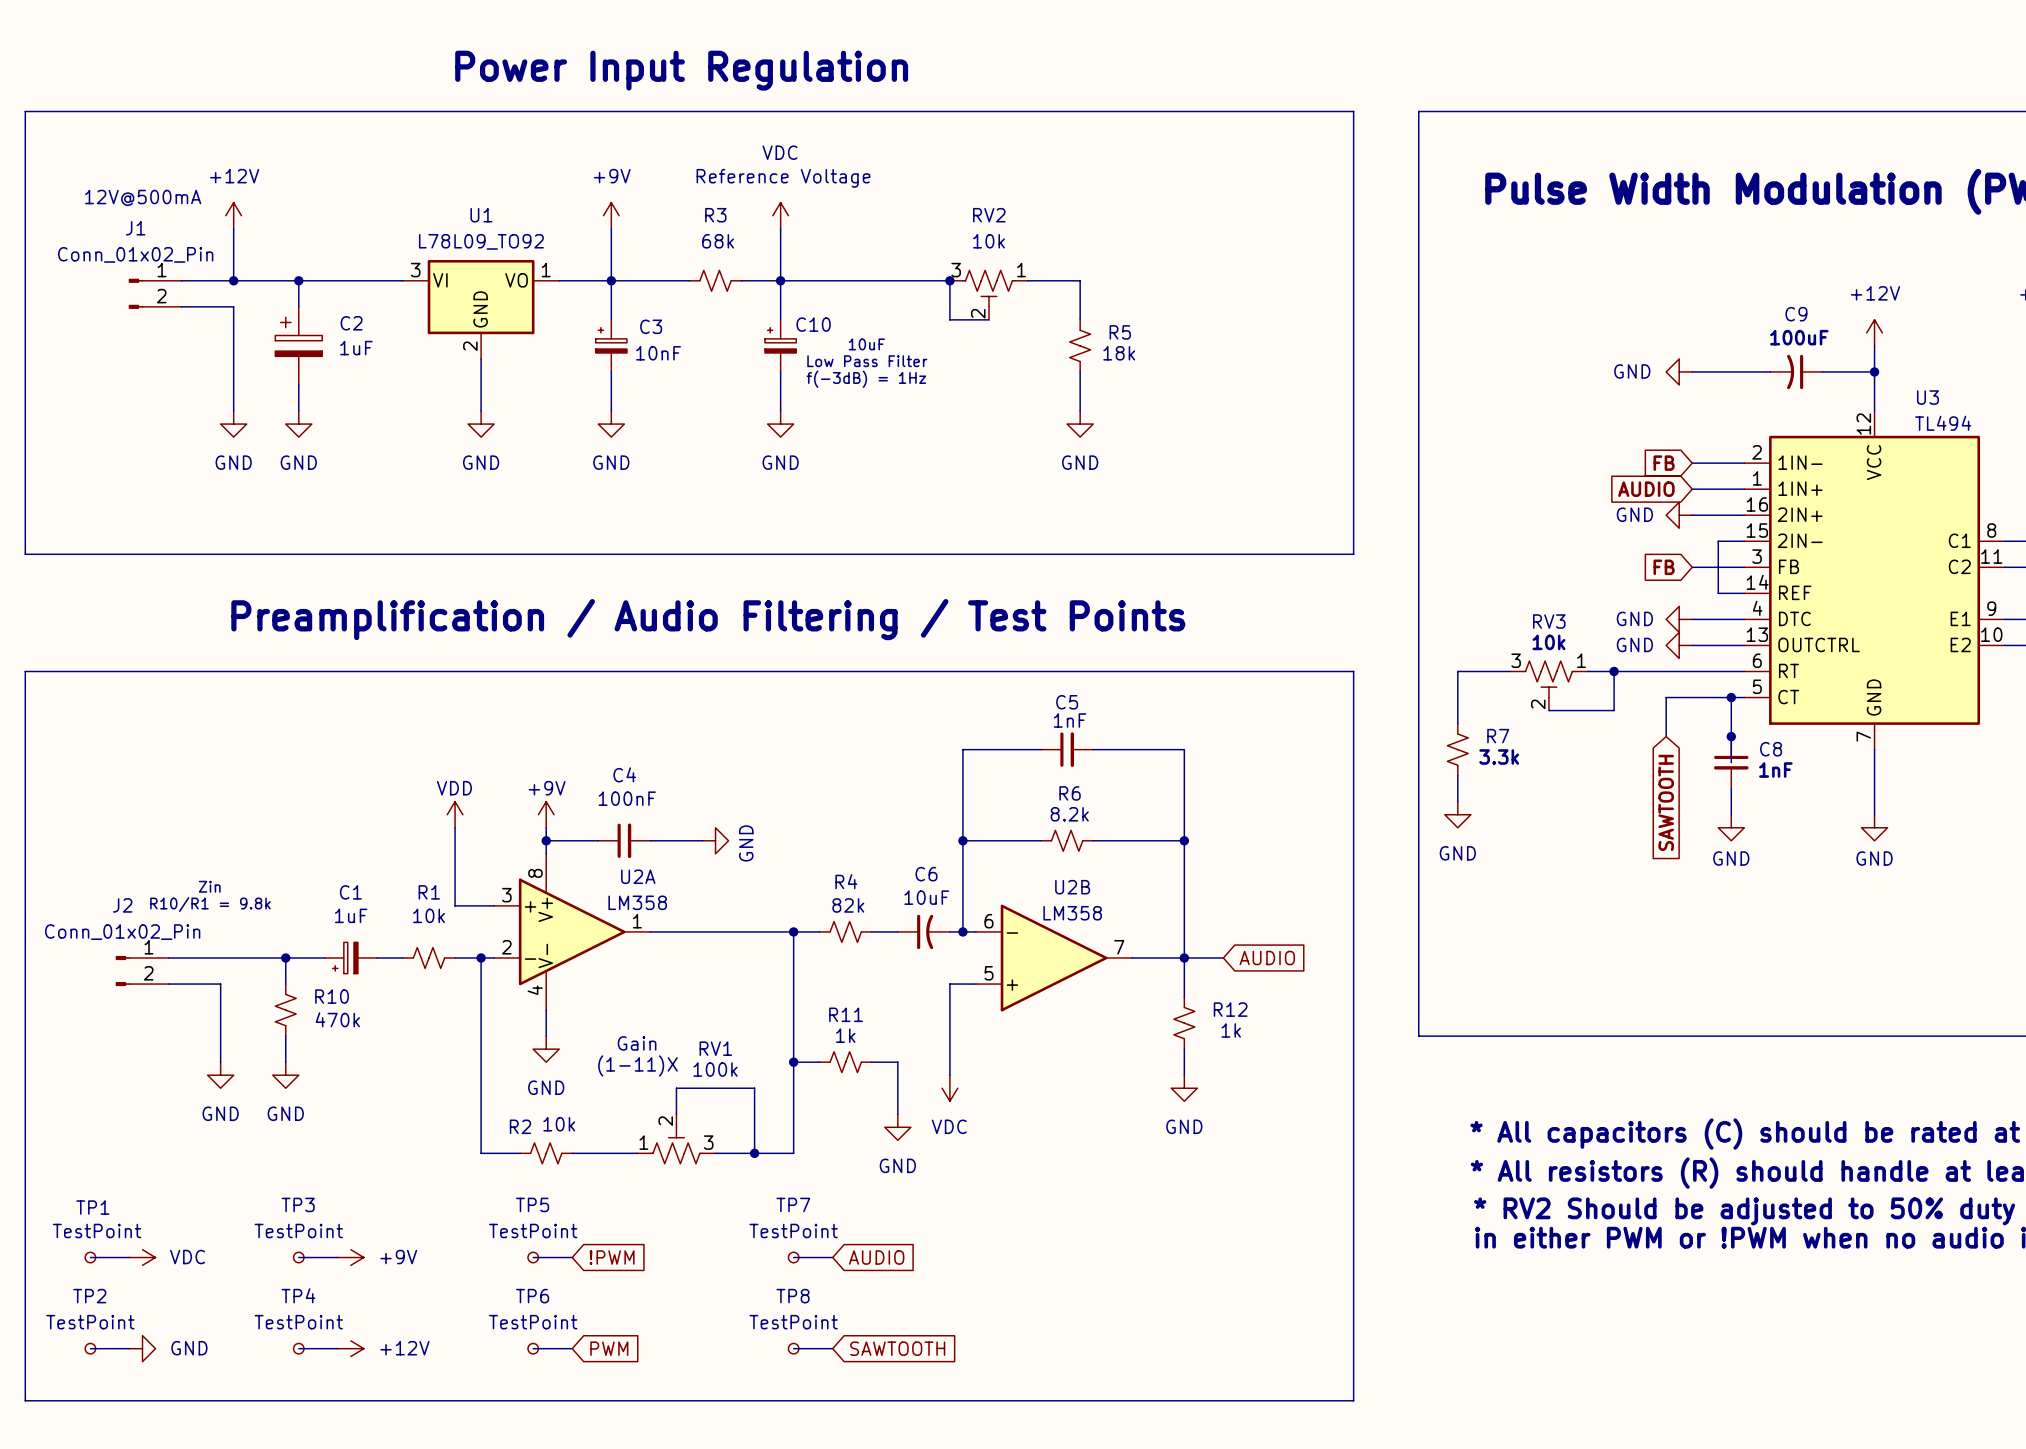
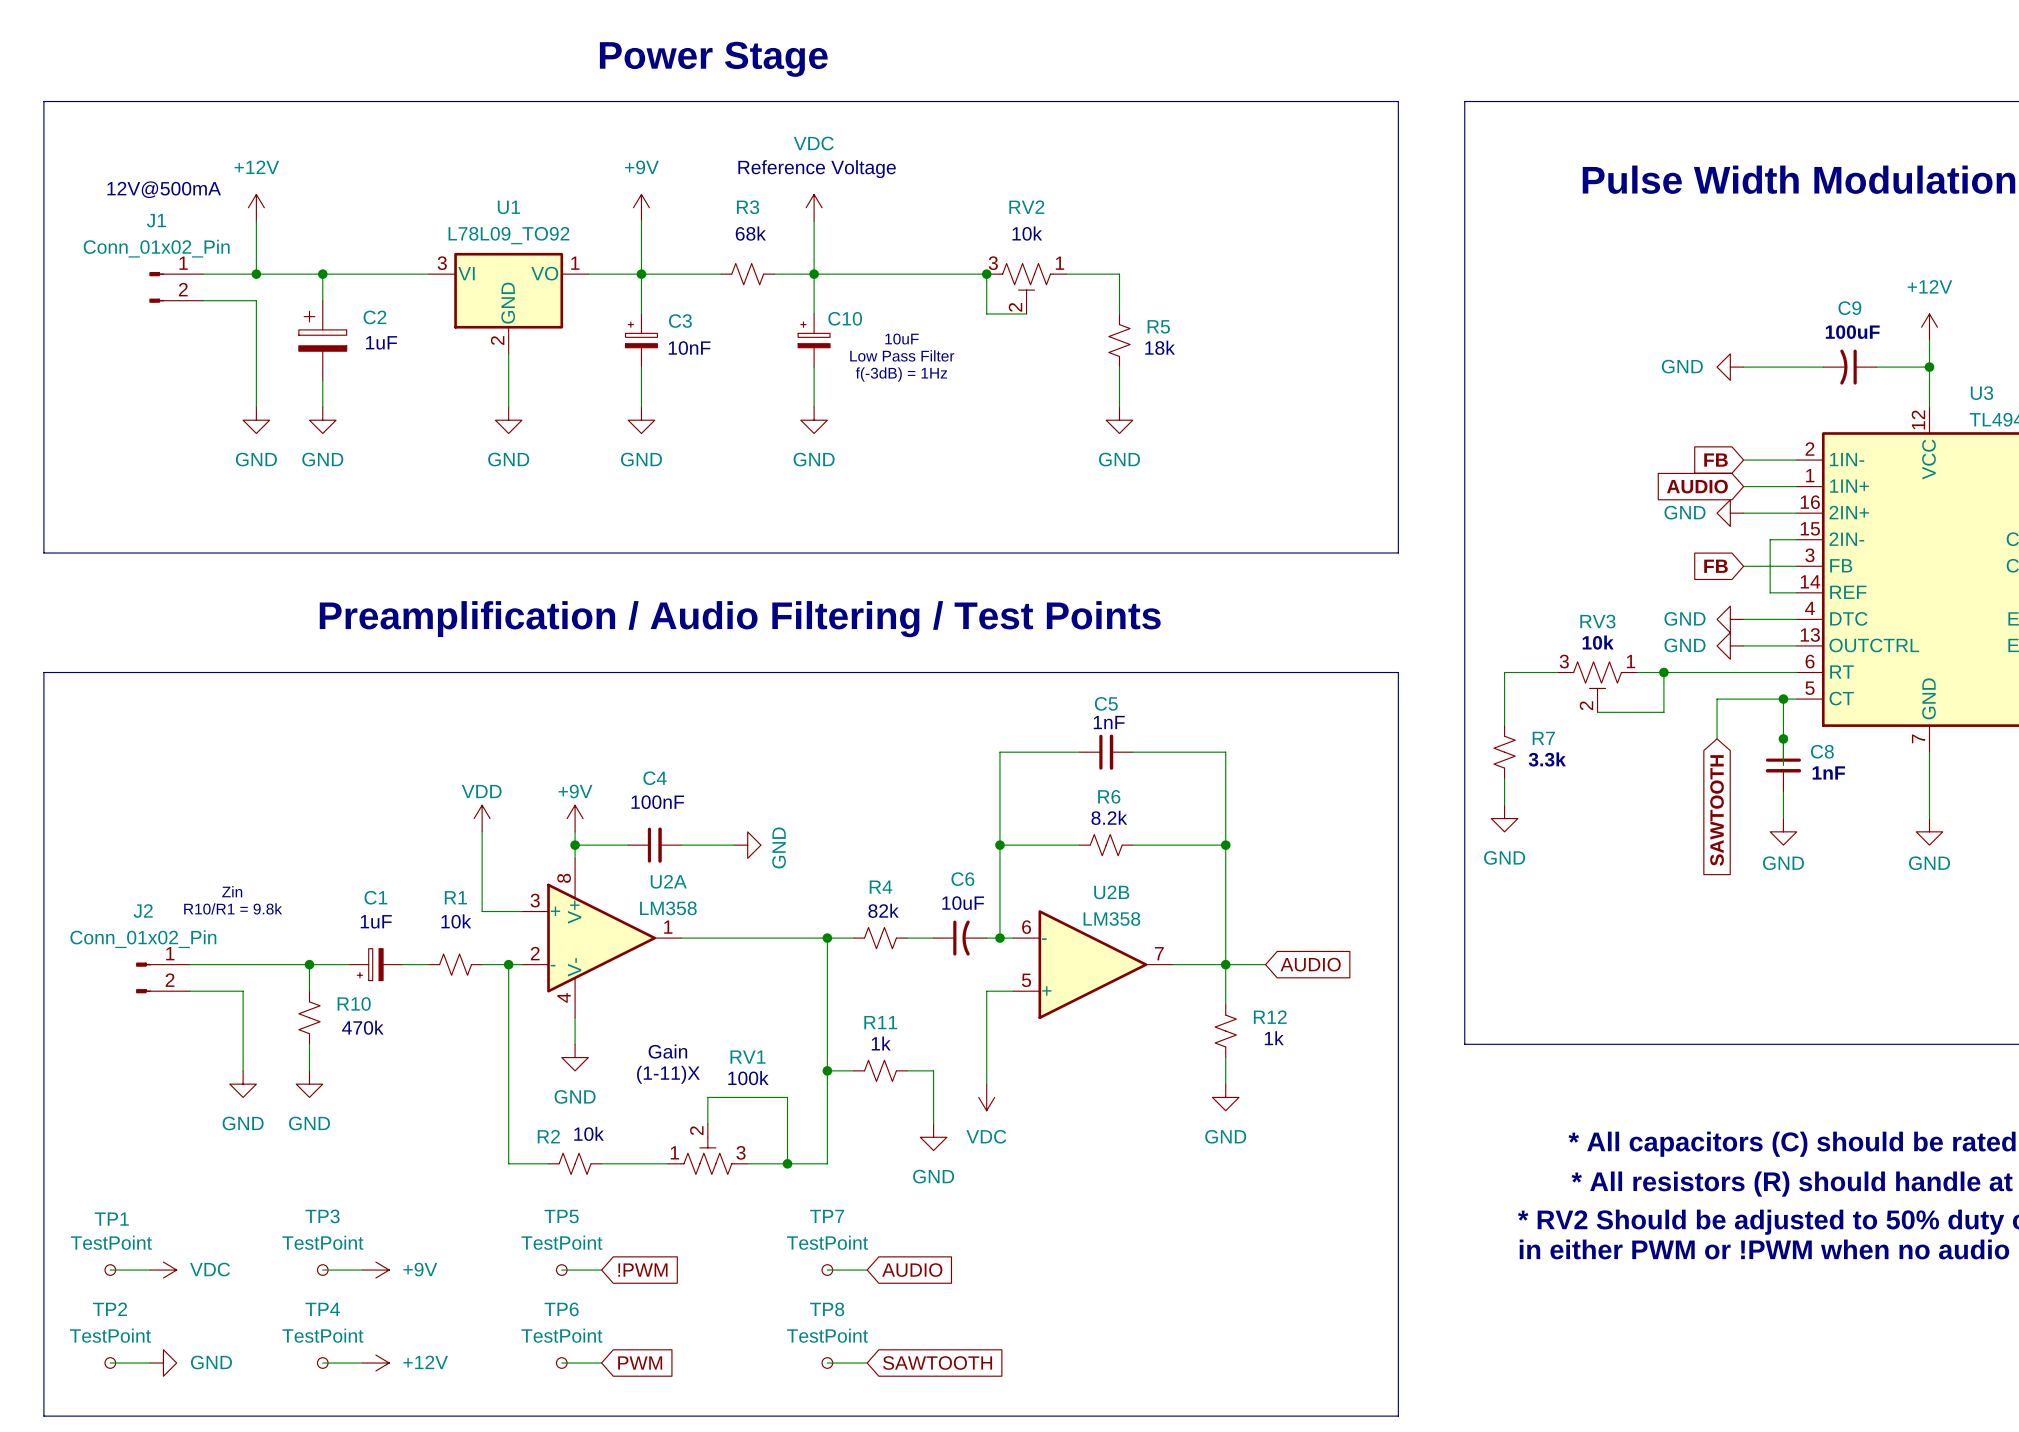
text: Power Input Regulation (681, 70) -> Power Stage (713, 59)

